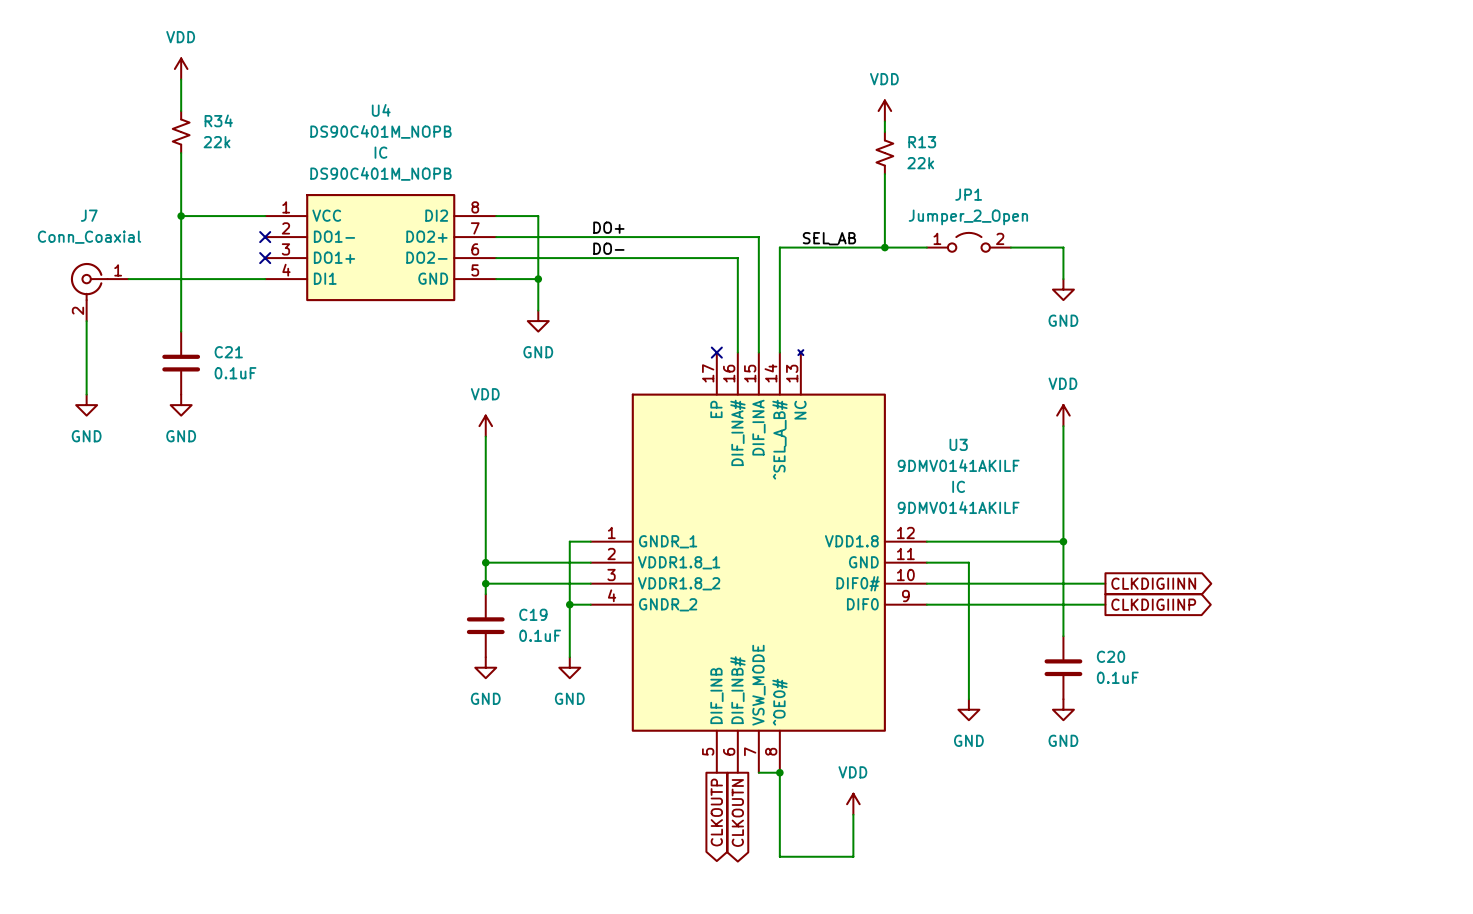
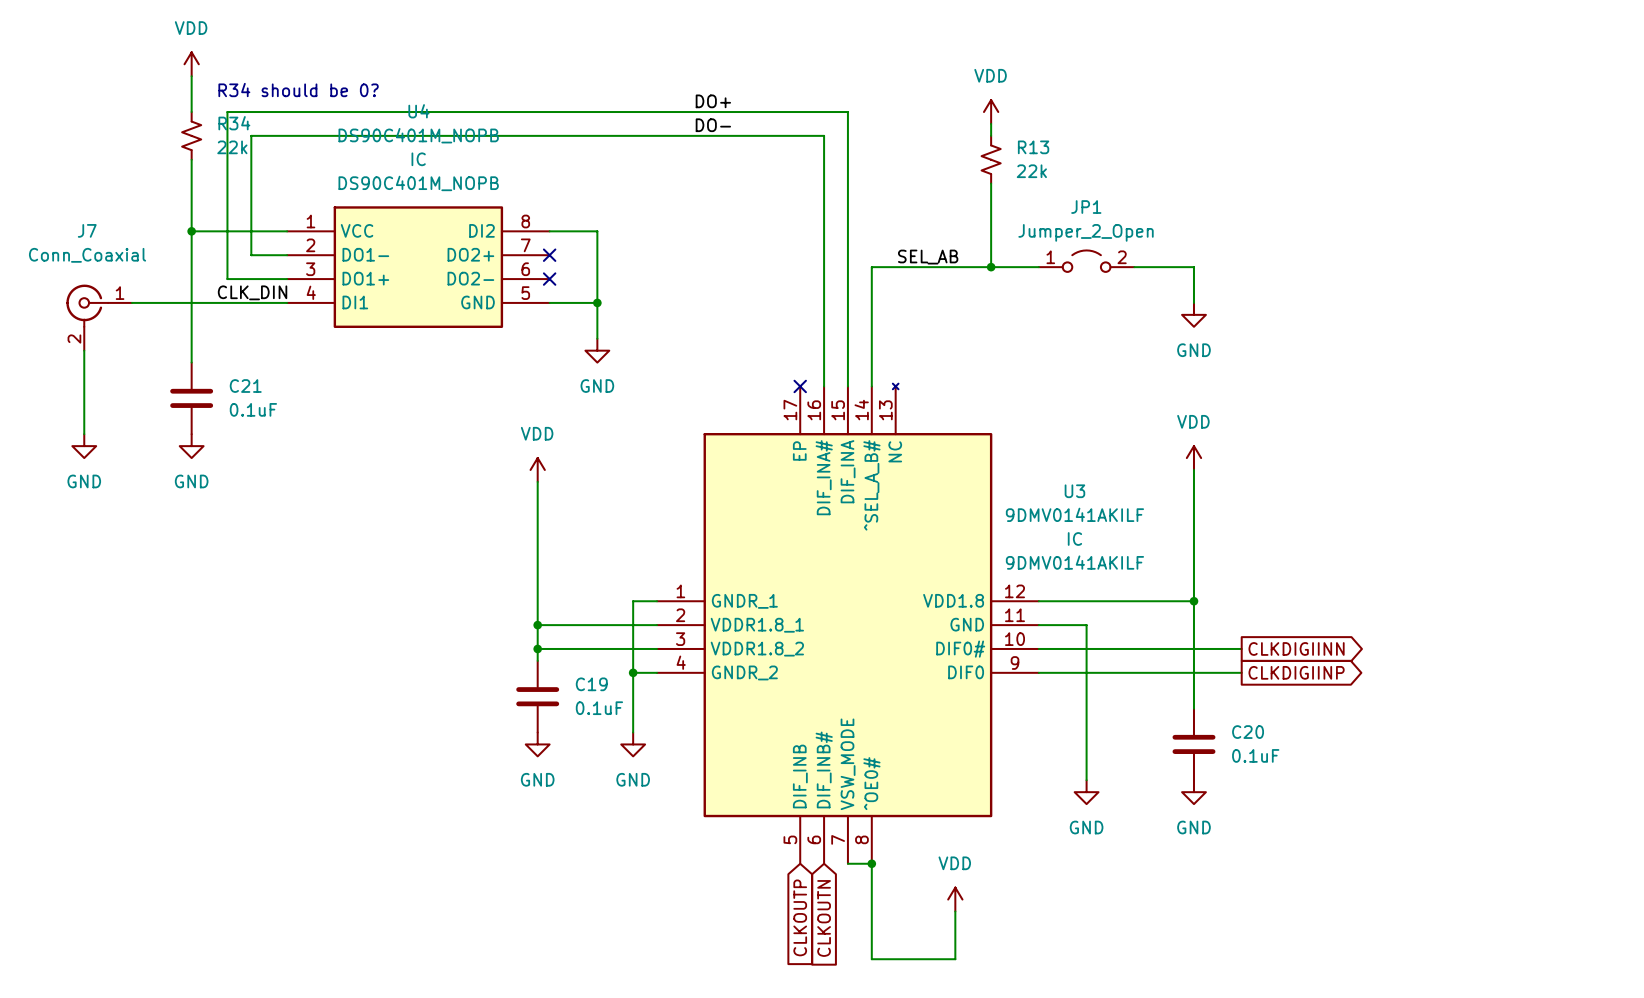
text: none -> R34 should be 0? (298, 90)
label position: DO+ (608, 227) -> DO+ (713, 101)
no-connect mark: (265, 237) -> none
wire: (496, 237) (758, 237) -> (287, 279) (227, 279) (227, 112) (847, 112) (847, 255)
no-connect mark: none -> (549, 255)
label position: DO- (608, 248) -> DO- (713, 125)
no-connect mark: (265, 258) -> none
wire: (496, 258) (737, 258) -> (287, 255) (251, 255) (251, 135) (824, 135) (824, 279)
no-connect mark: none -> (549, 279)
label: none -> CLK_DIN (252, 292)
global label shape: output (716, 812) -> input (800, 917)
global label shape: output (737, 813) -> input (824, 918)

